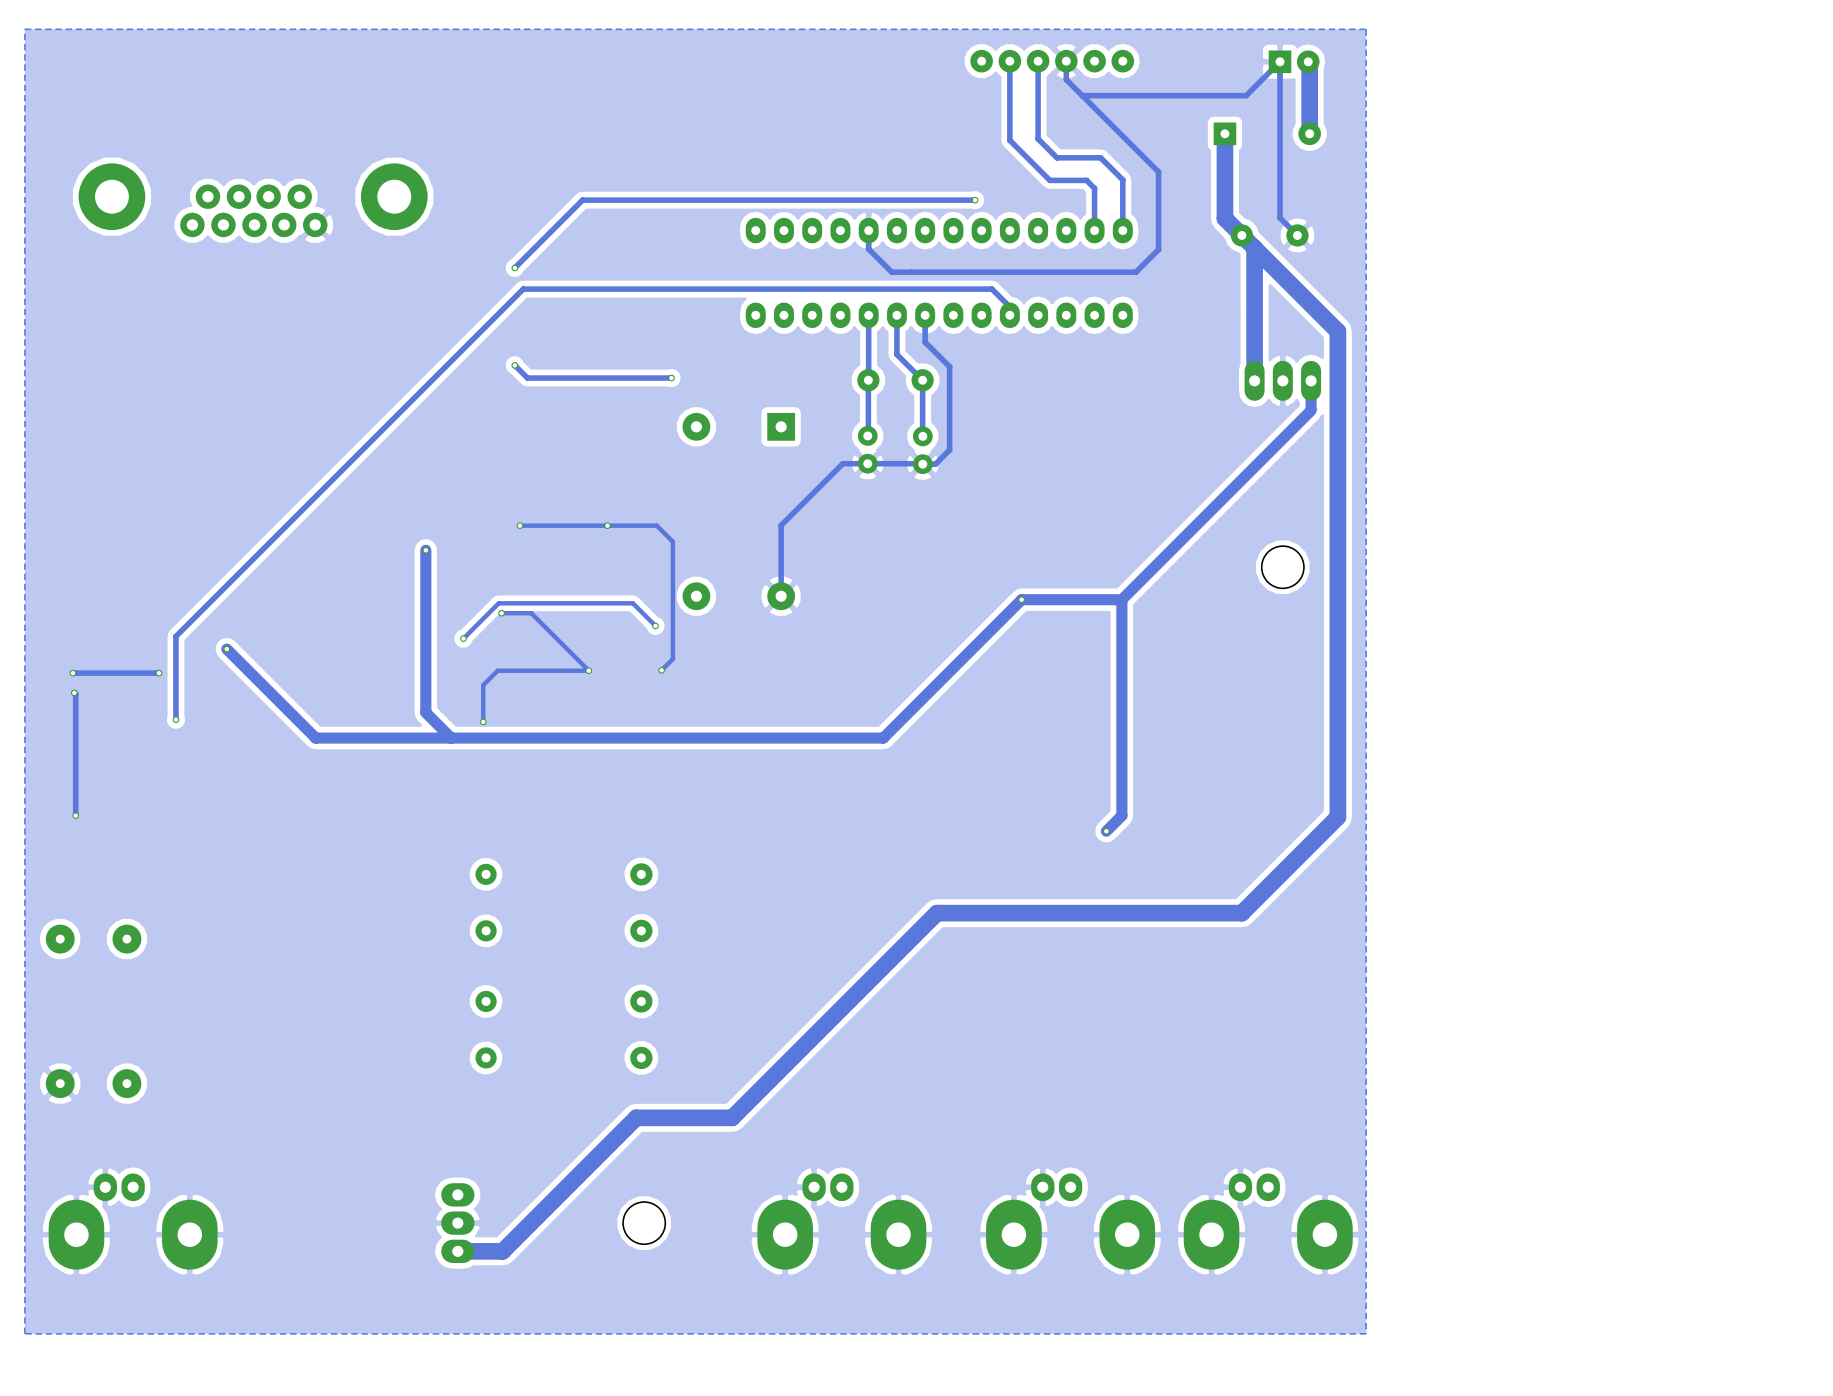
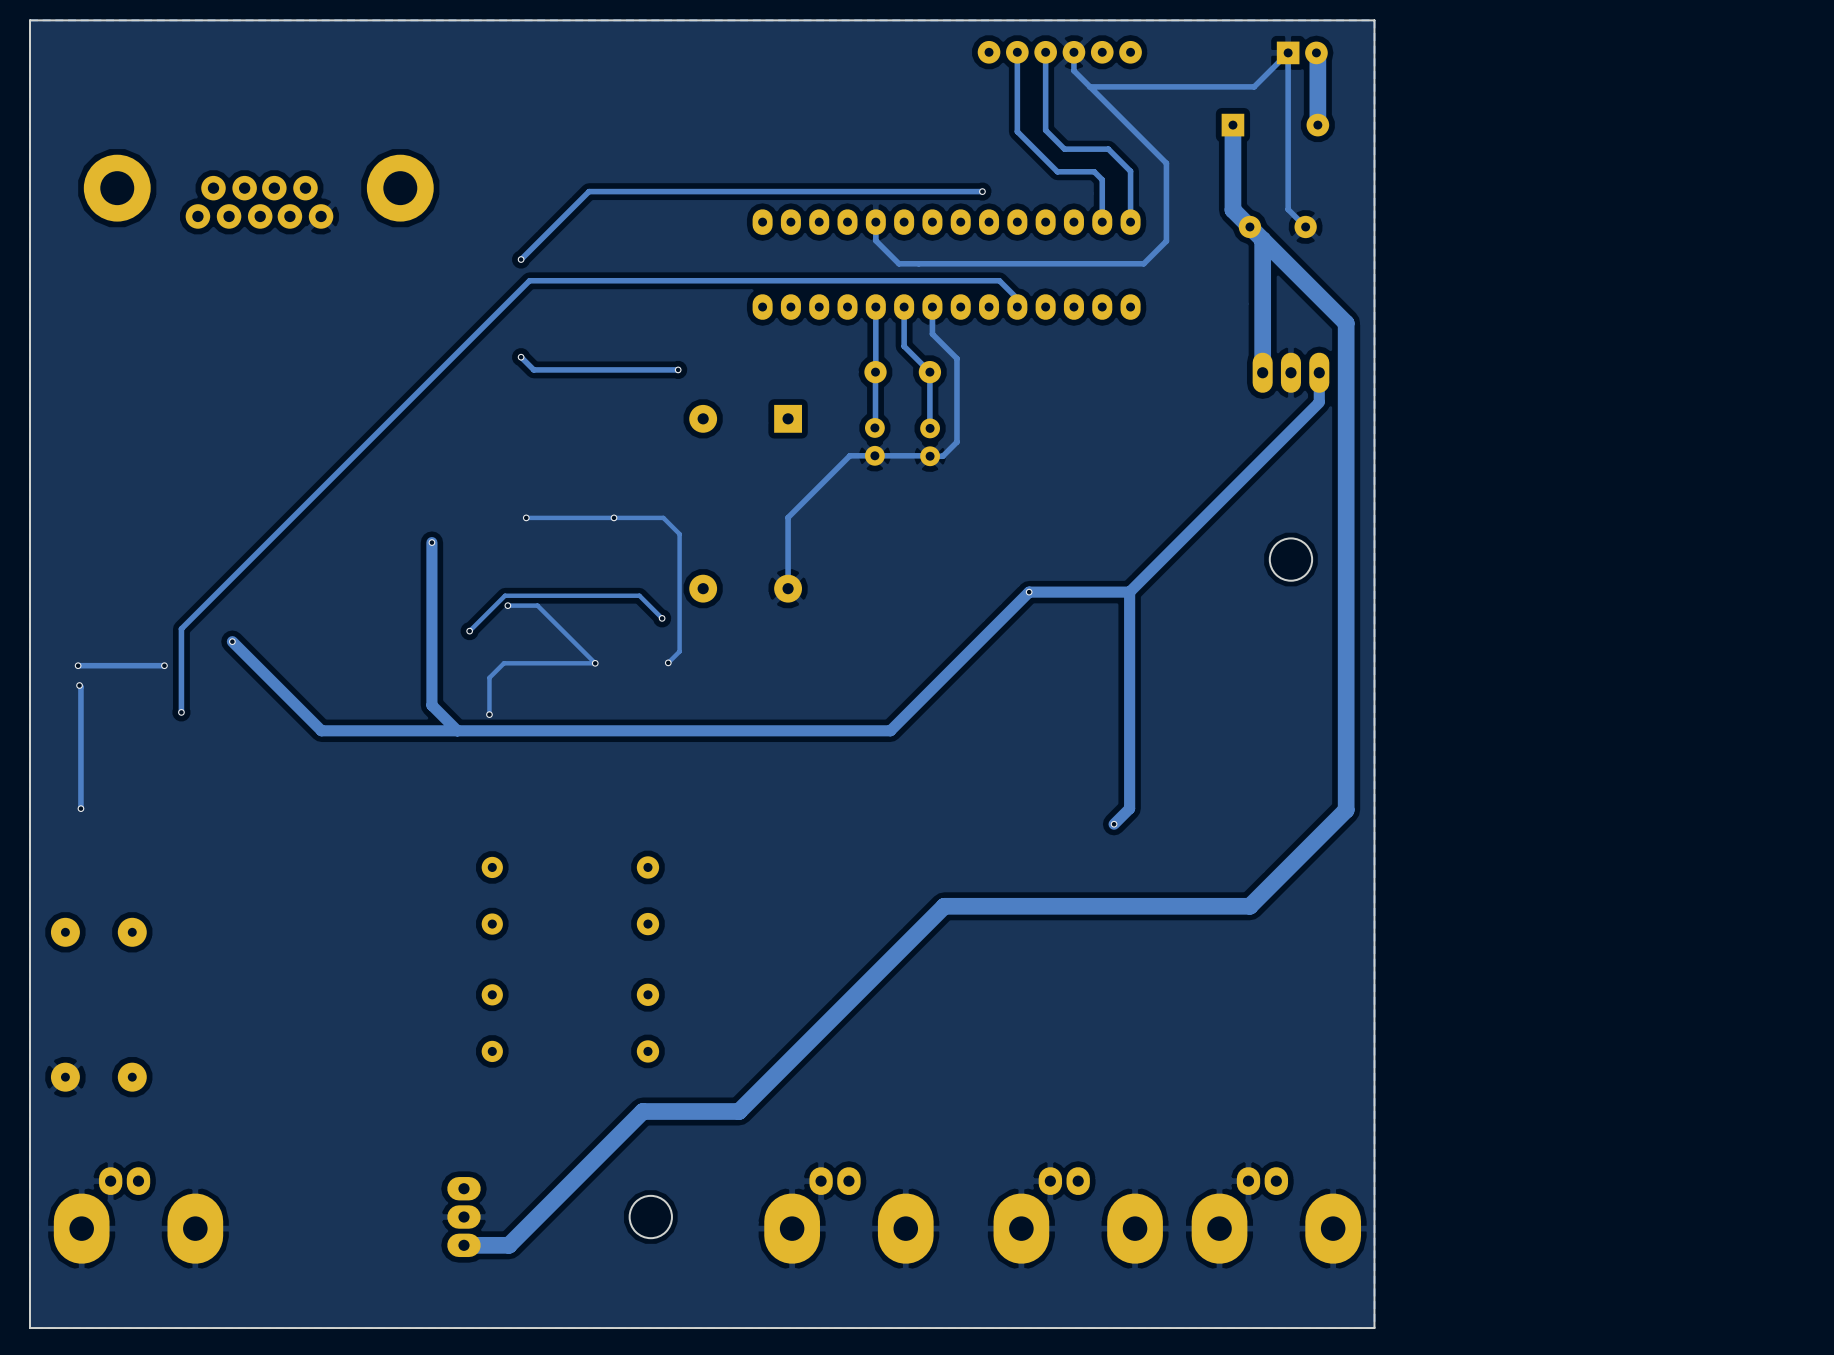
board edge: none -> (1374, 20) (30, 20) (30, 1328) (1374, 1328) (1374, 20)

